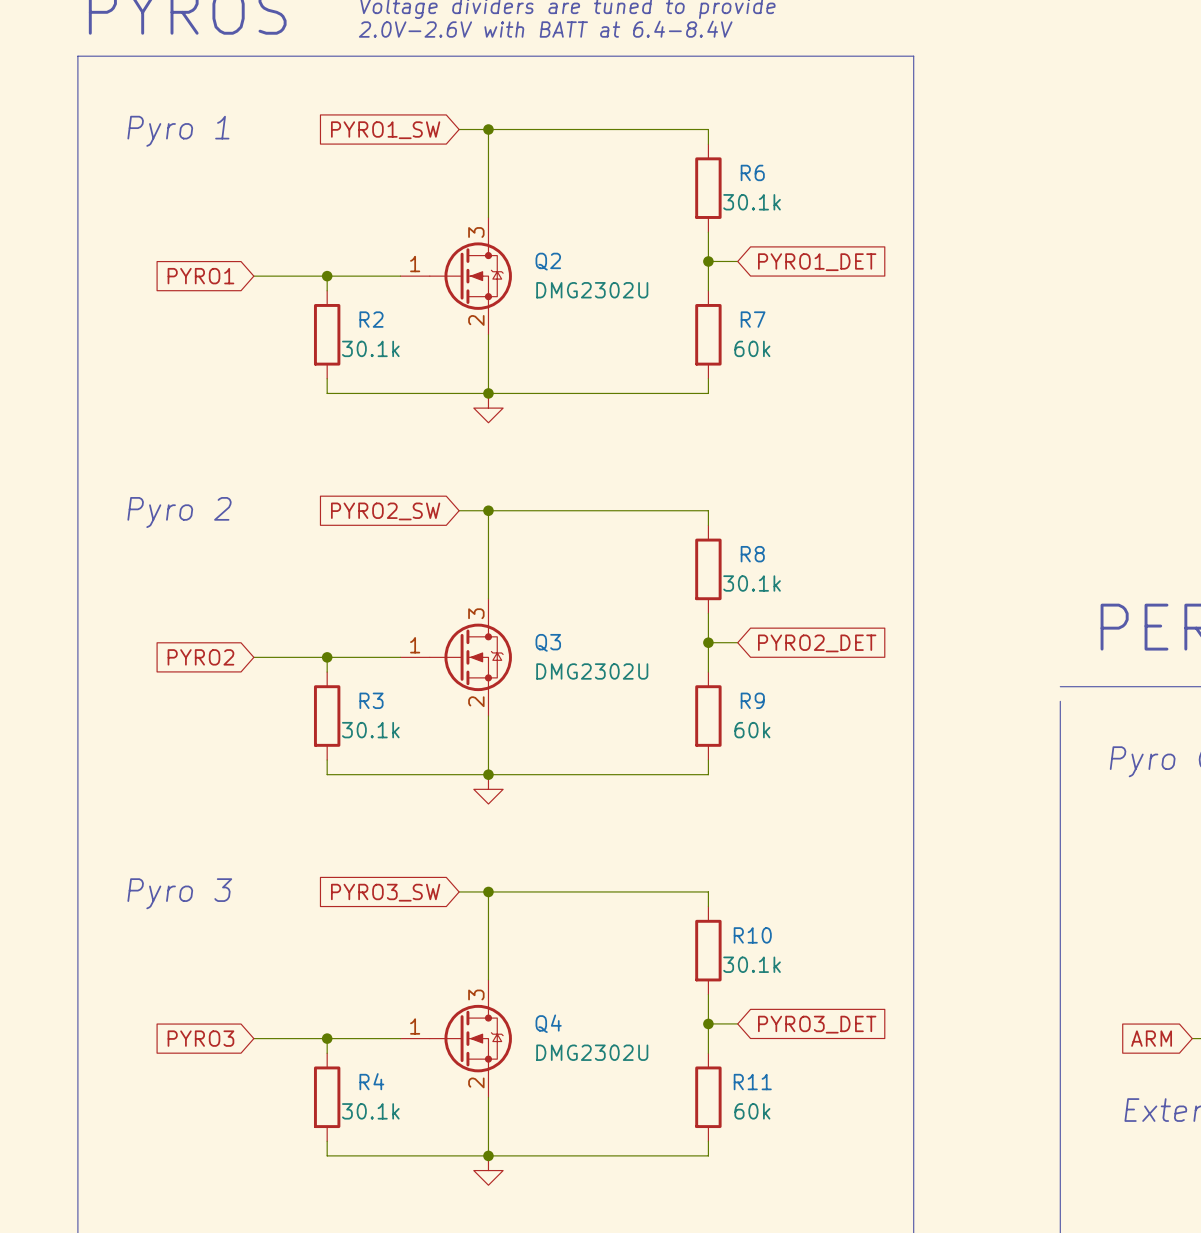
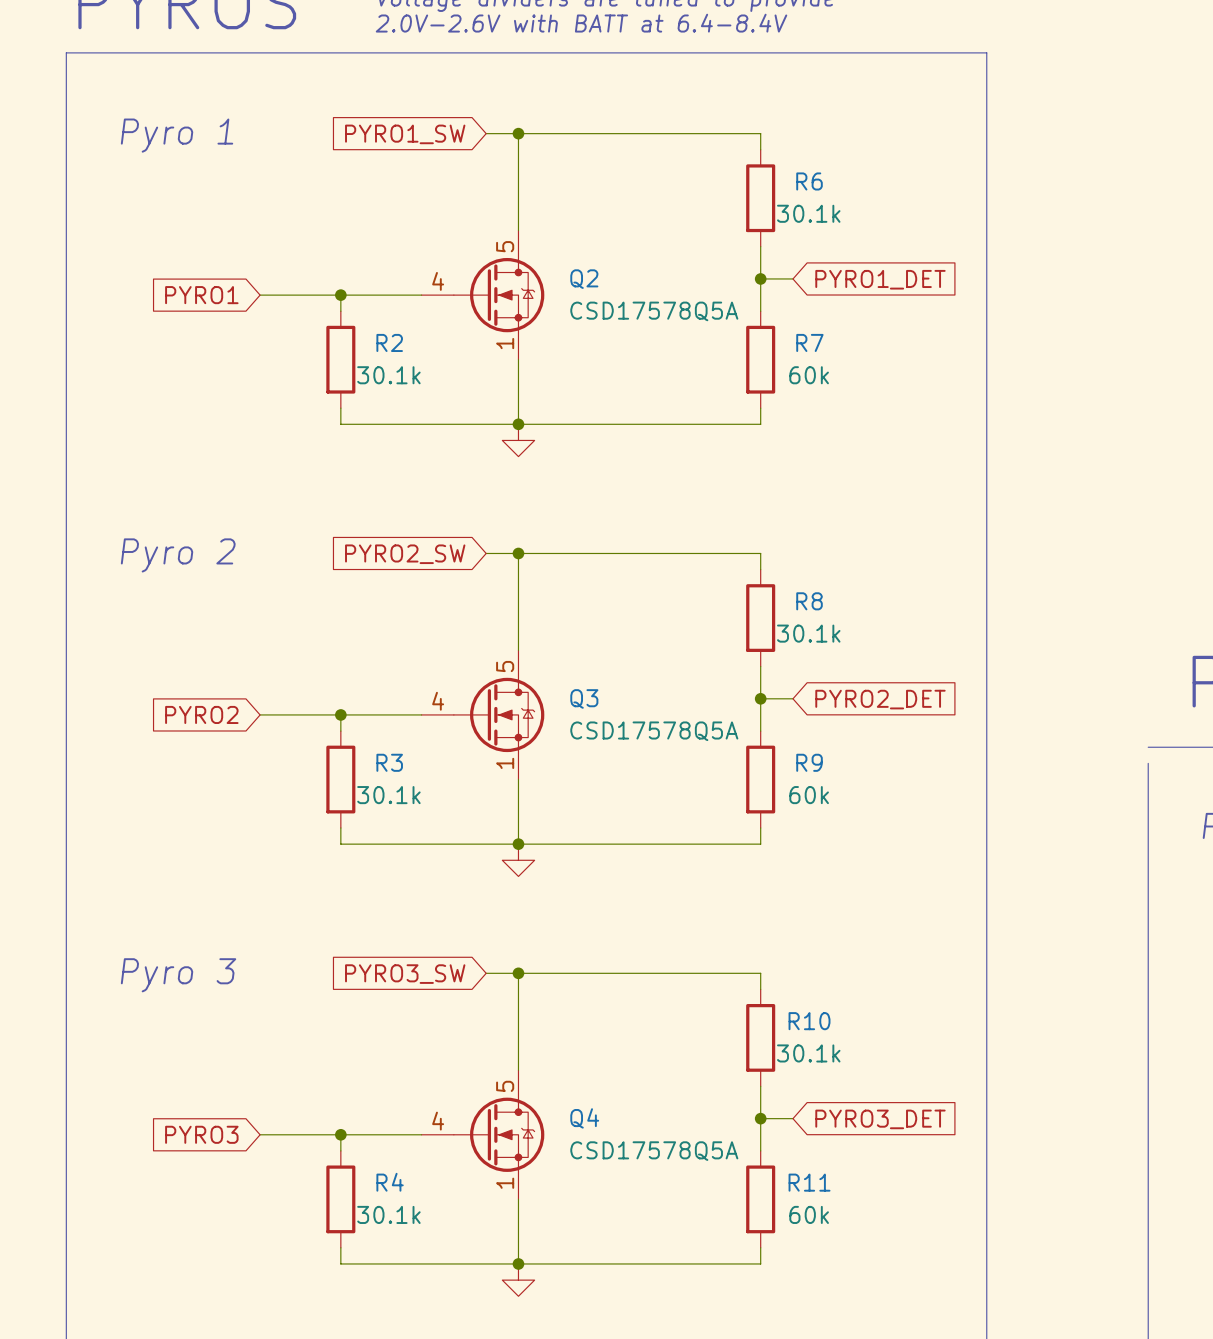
Q2 pin number: 3 (476, 232) -> 5 (505, 246)
Q2 pin number: 1 (415, 264) -> 4 (438, 281)
Q2 value: DMG2302U (592, 290) -> CSD17578Q5A (654, 311)
Q2 pin number: 2 (476, 320) -> 1 (505, 343)
Q3 pin number: 3 (476, 613) -> 5 (505, 666)
Q3 pin number: 1 (415, 645) -> 4 (438, 701)
Q3 value: DMG2302U (592, 671) -> CSD17578Q5A (654, 731)
Q3 pin number: 2 (476, 701) -> 1 (505, 763)
Q4 pin number: 3 (476, 994) -> 5 (505, 1086)
Q4 pin number: 1 (415, 1026) -> 4 (438, 1121)
Q4 value: DMG2302U (592, 1052) -> CSD17578Q5A (654, 1151)
Q4 pin number: 2 (476, 1082) -> 1 (505, 1183)

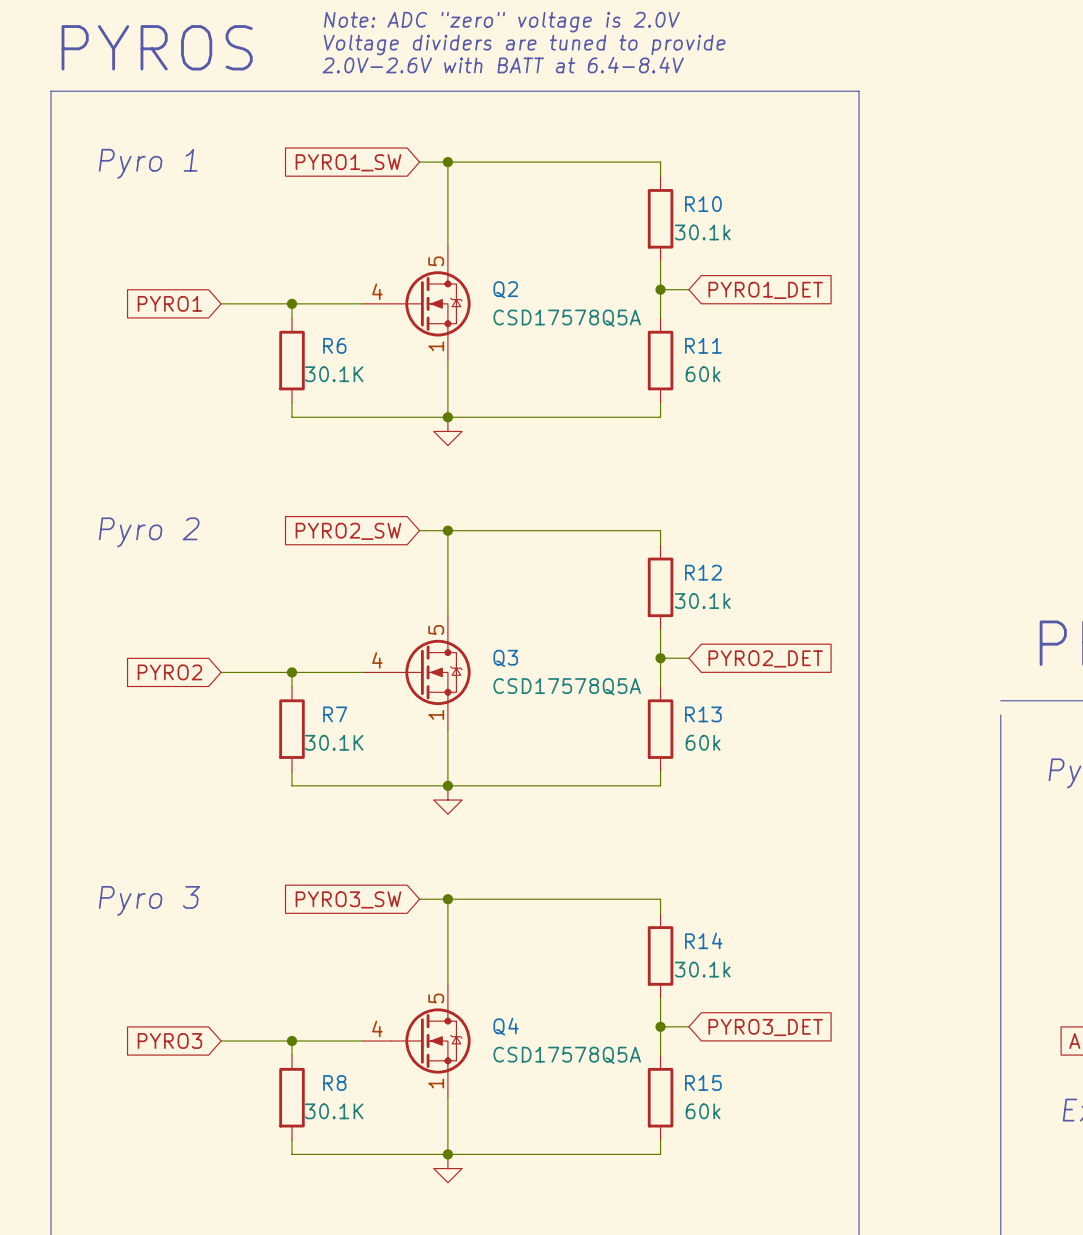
R6 name: R6 (809, 181) -> R10 (703, 204)
R2 name: R2 (389, 342) -> R6 (334, 345)
R7 name: R7 (809, 342) -> R11 (703, 345)
R2 value: 30.1k (388, 375) -> 30.1K (334, 374)
R8 name: R8 (809, 601) -> R12 (703, 572)
R3 name: R3 (389, 762) -> R7 (335, 714)
R9 name: R9 (809, 762) -> R13 (703, 714)
R3 value: 30.1k (388, 795) -> 30.1K (334, 742)
R10 name: R10 (809, 1021) -> R14 (703, 940)
R4 name: R4 (390, 1182) -> R8 (334, 1083)
R11 name: R11 (809, 1182) -> R15 (703, 1083)
R4 value: 30.1k (388, 1214) -> 30.1K (334, 1111)

